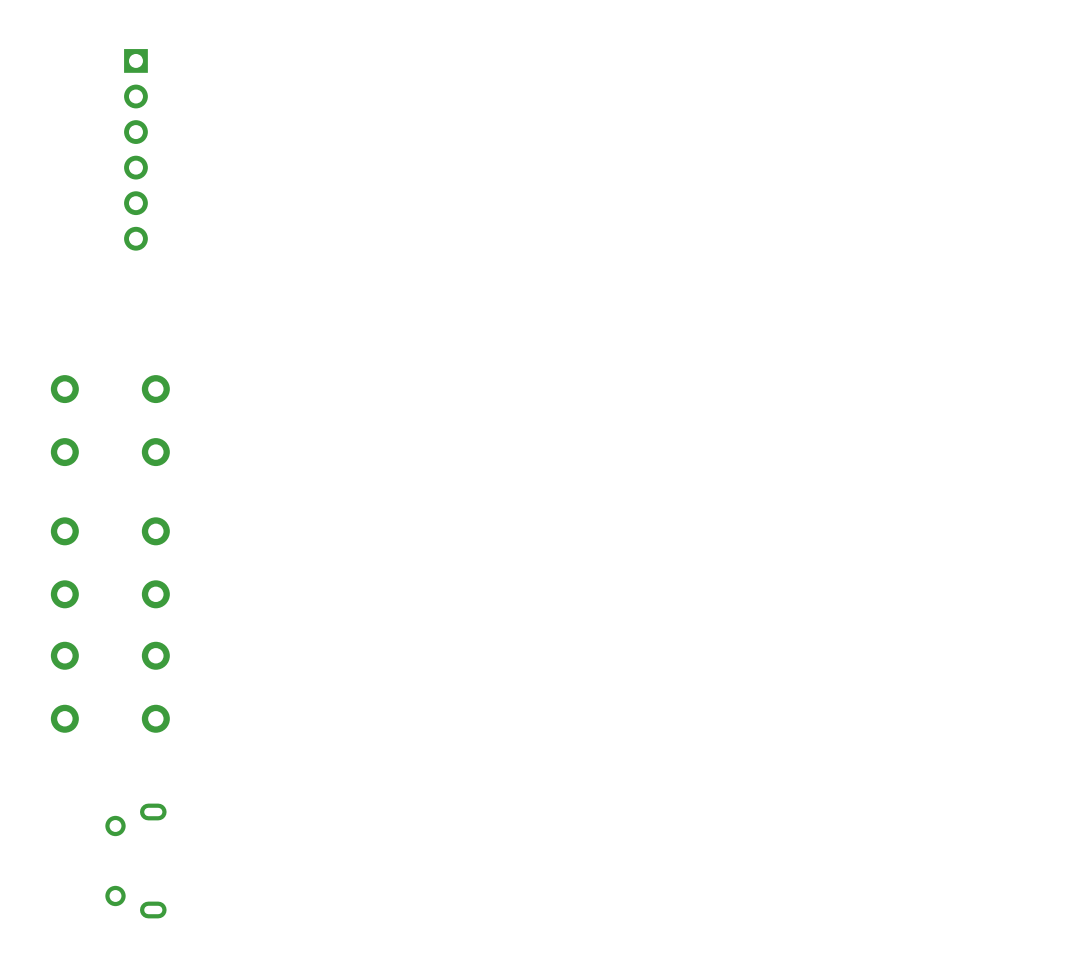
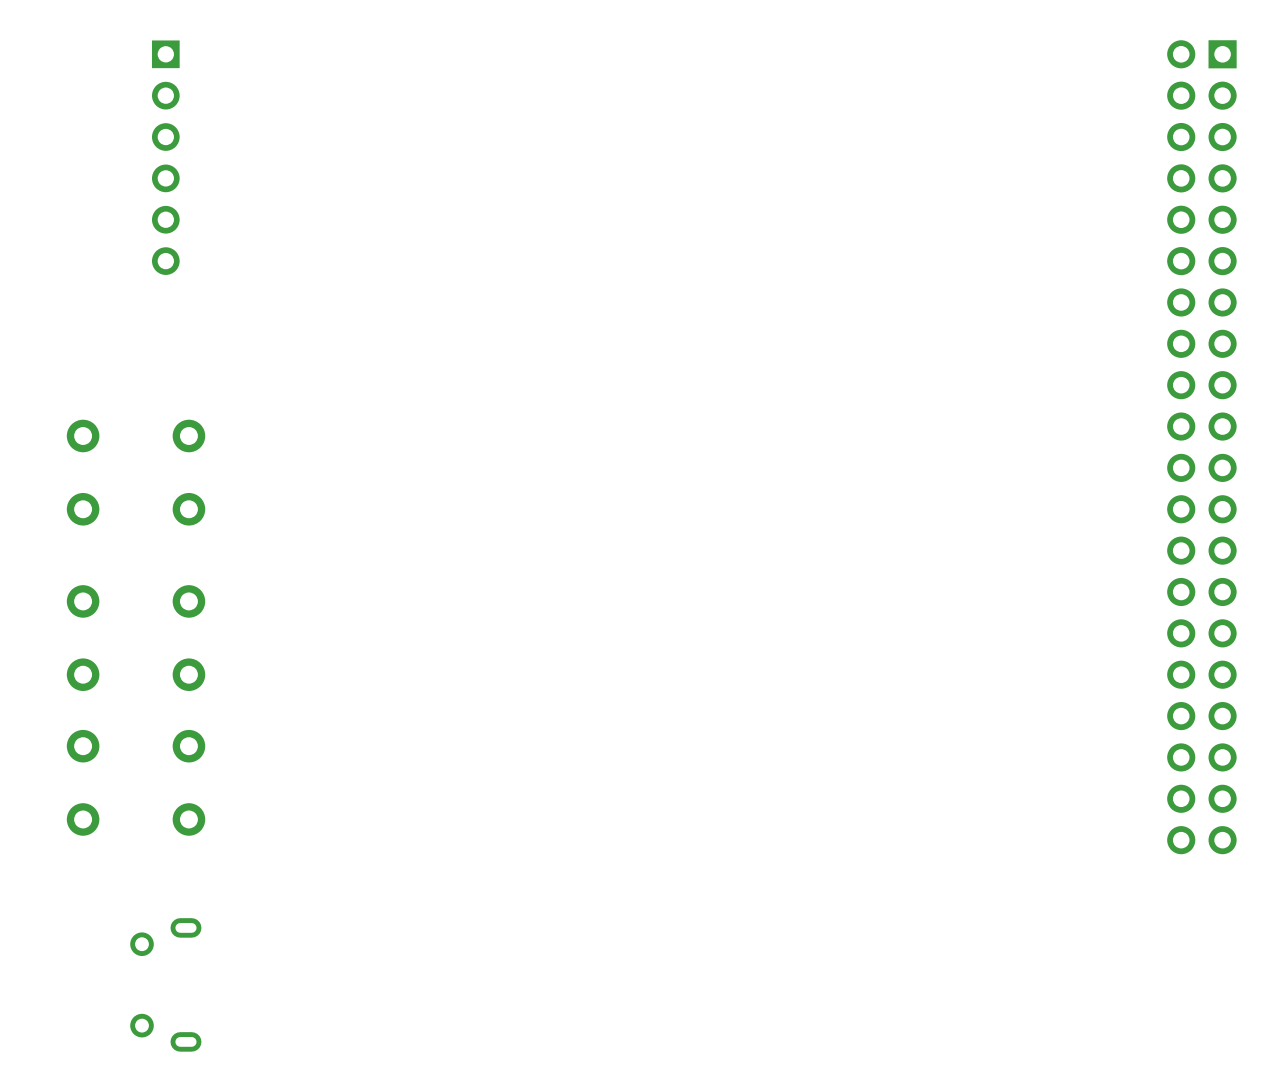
part: none -> (1201, 447)

